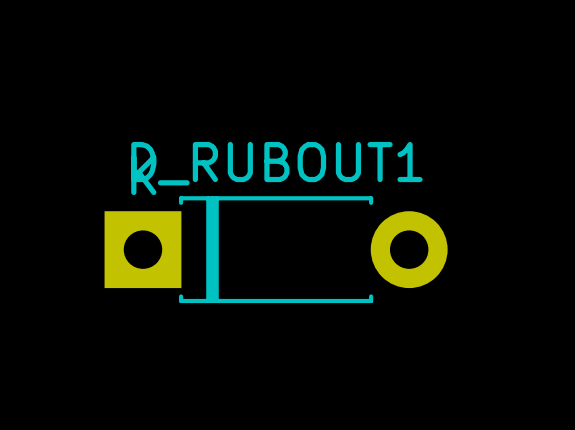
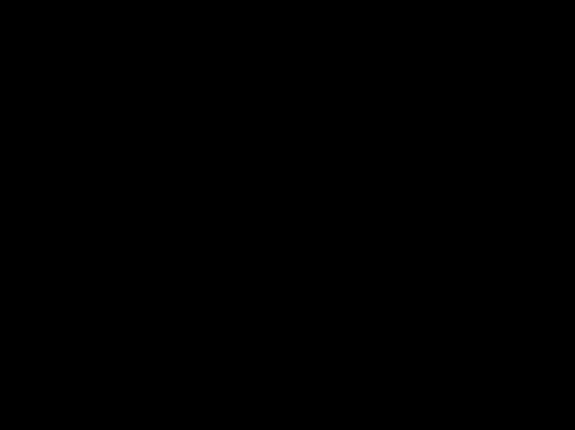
D_RUBOUT1: (276, 249) -> none

